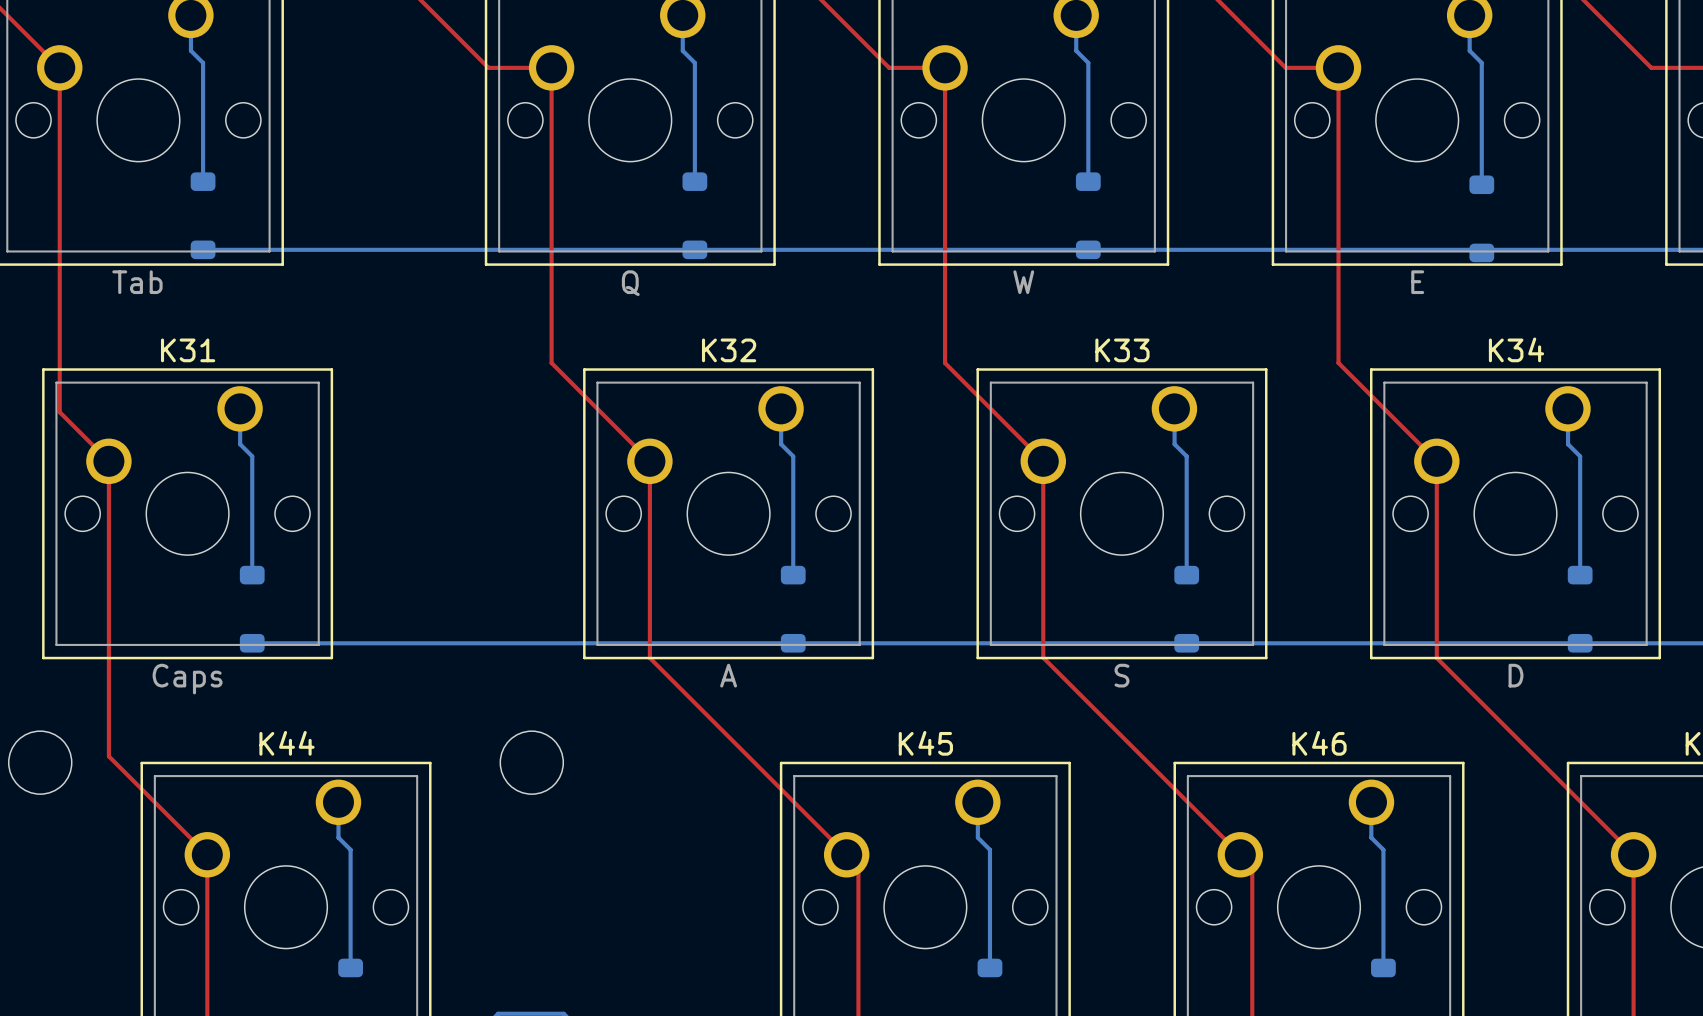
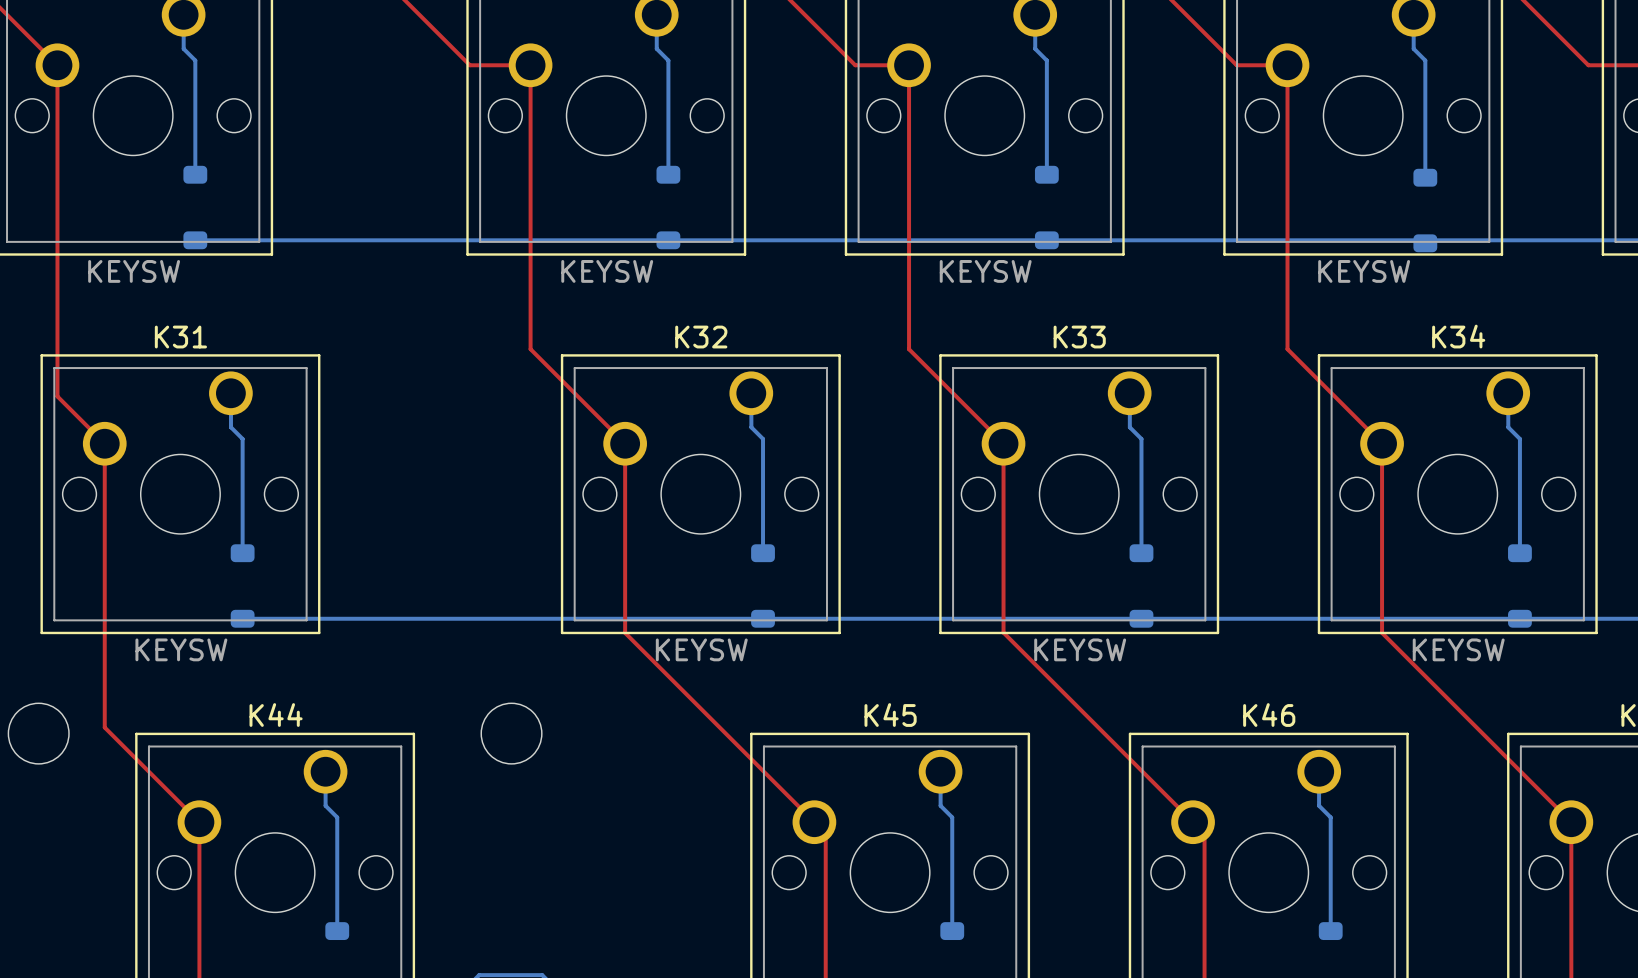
part value: Tab (137, 282) -> KEYSW (134, 271)
part value: W (1023, 282) -> KEYSW (985, 271)
part value: E (1417, 282) -> KEYSW (1364, 271)
part value: Q (630, 283) -> KEYSW (607, 271)
K32 value: A (728, 675) -> KEYSW (701, 649)
K33 value: S (1121, 675) -> KEYSW (1080, 649)
K34 value: D (1515, 675) -> KEYSW (1458, 649)
K31 value: Caps (187, 679) -> KEYSW (181, 649)

